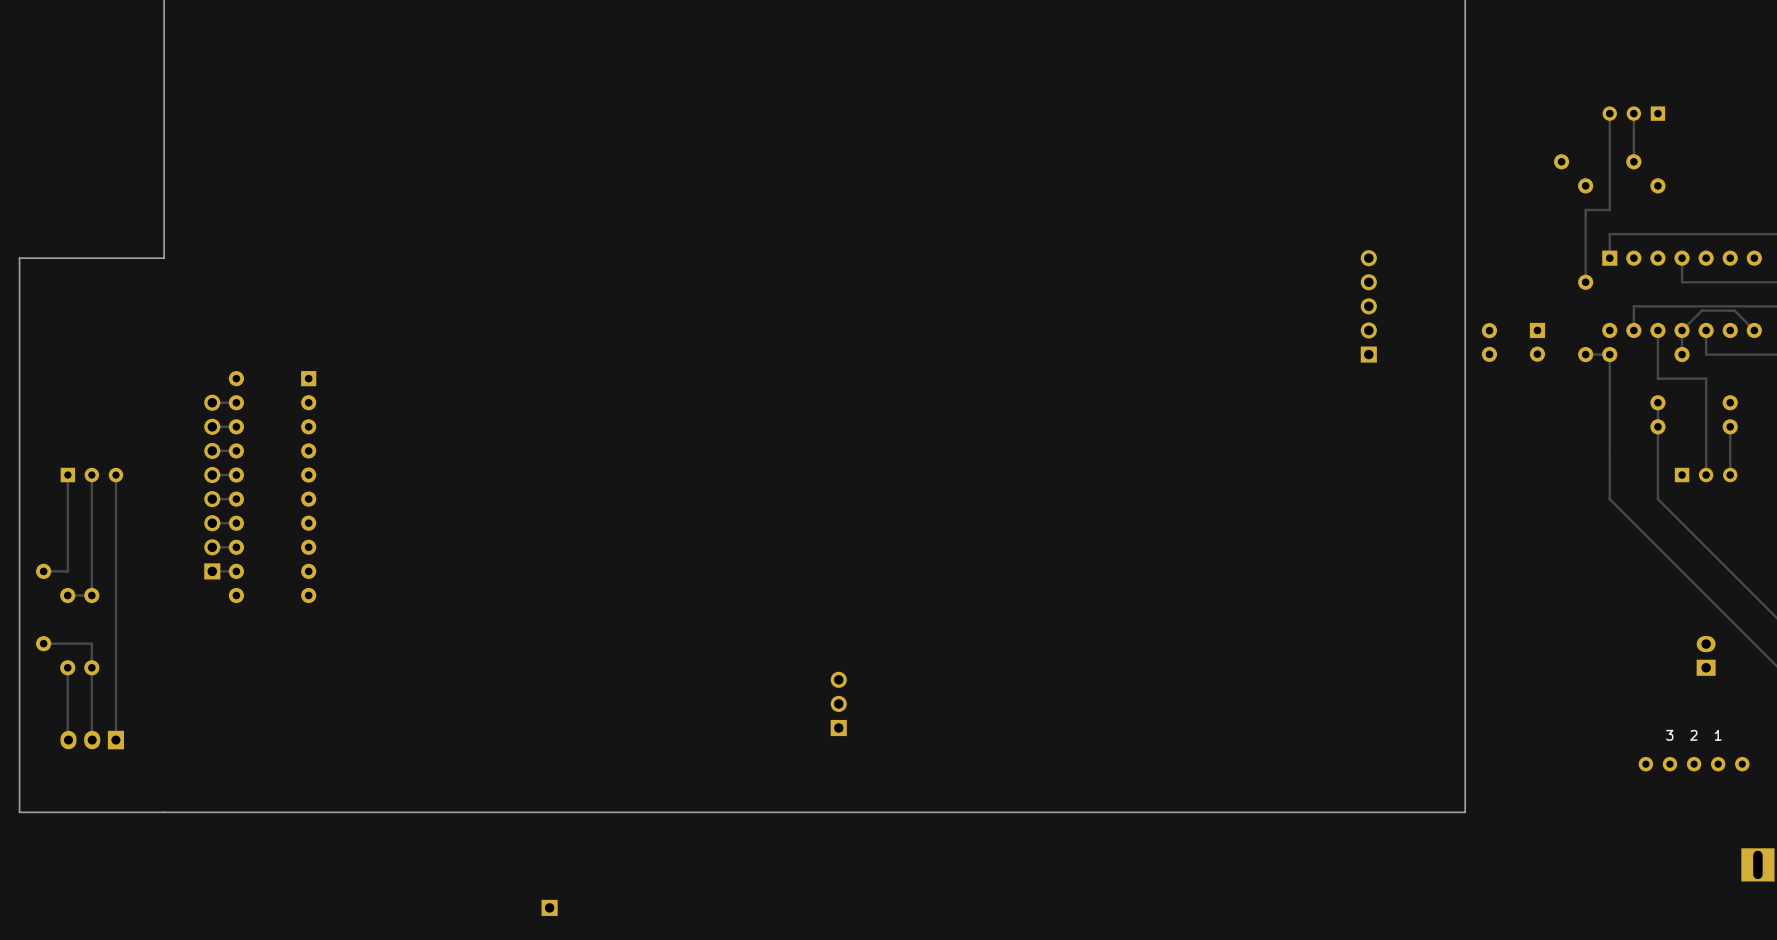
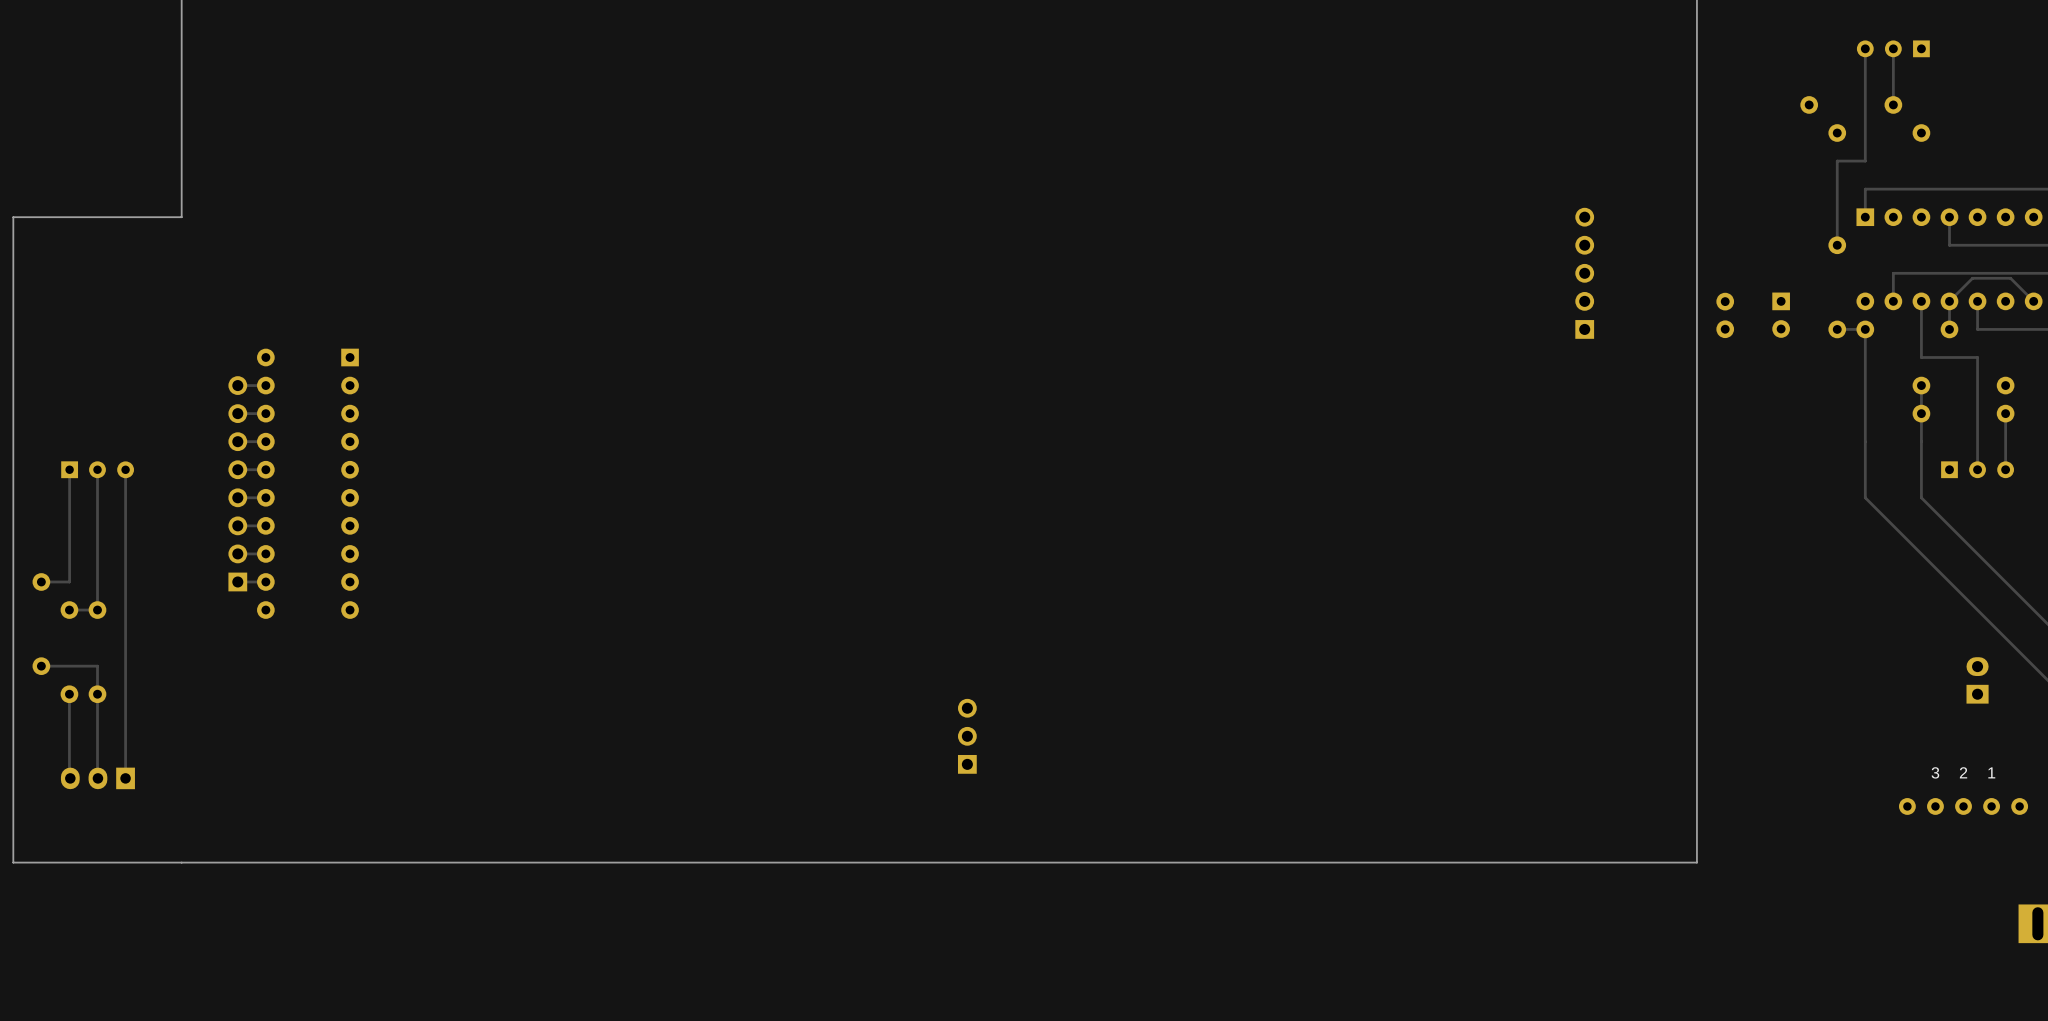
part: (549, 907) -> none

